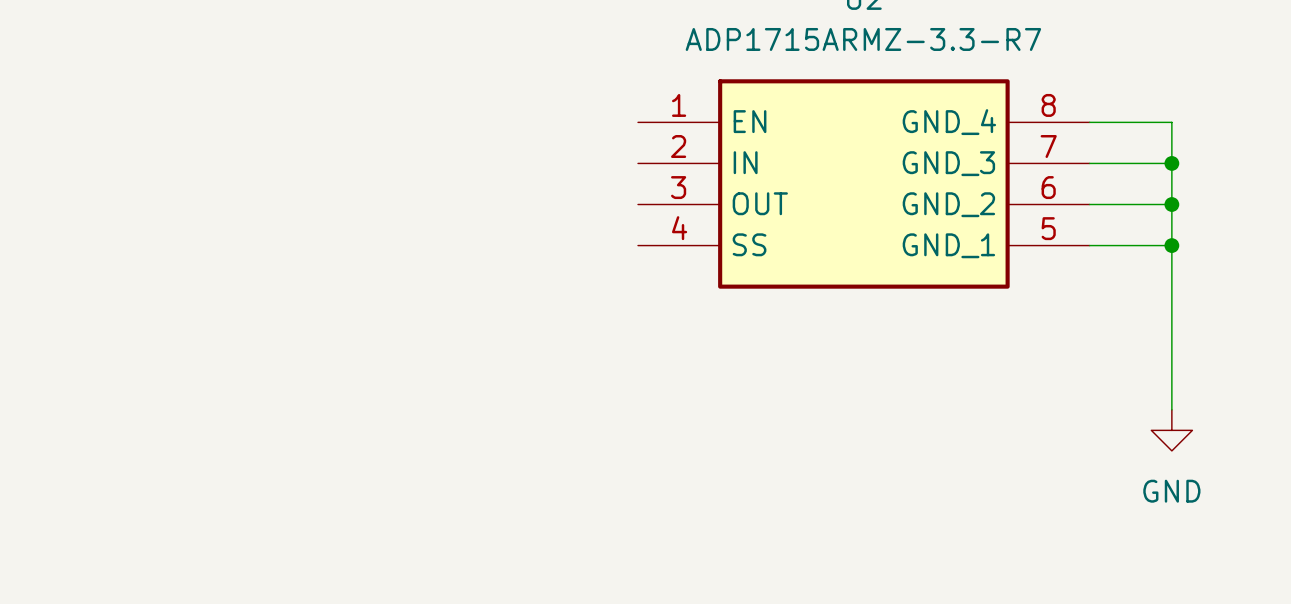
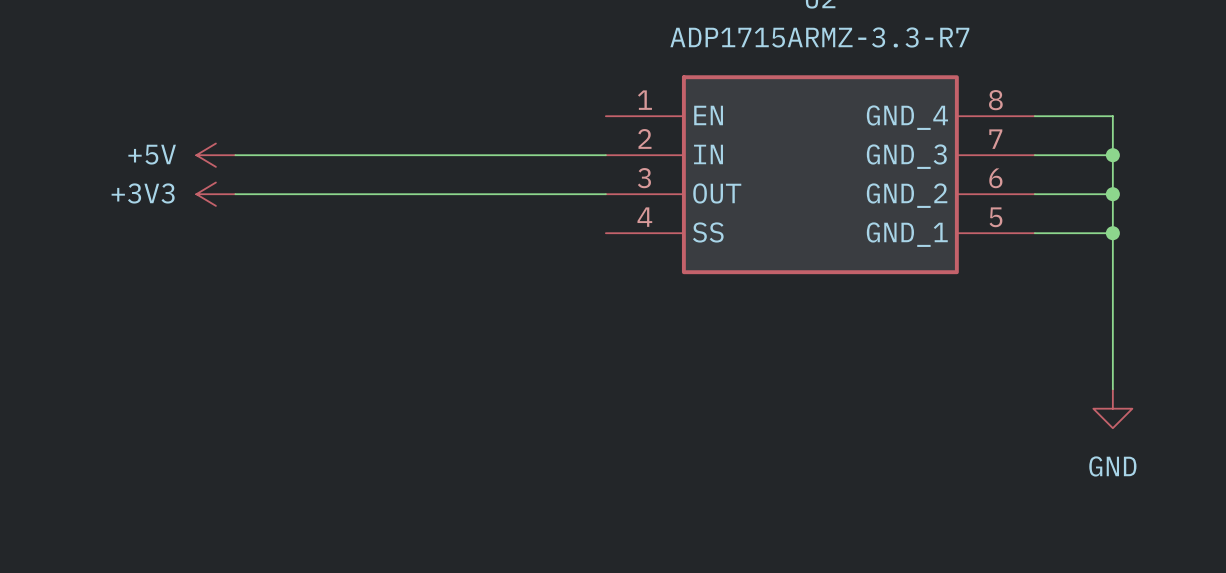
power symbol: none -> +5V (215, 155)
wire: none -> (235, 155) (605, 155)
power symbol: none -> +3V3 (215, 194)
wire: none -> (235, 194) (605, 194)

